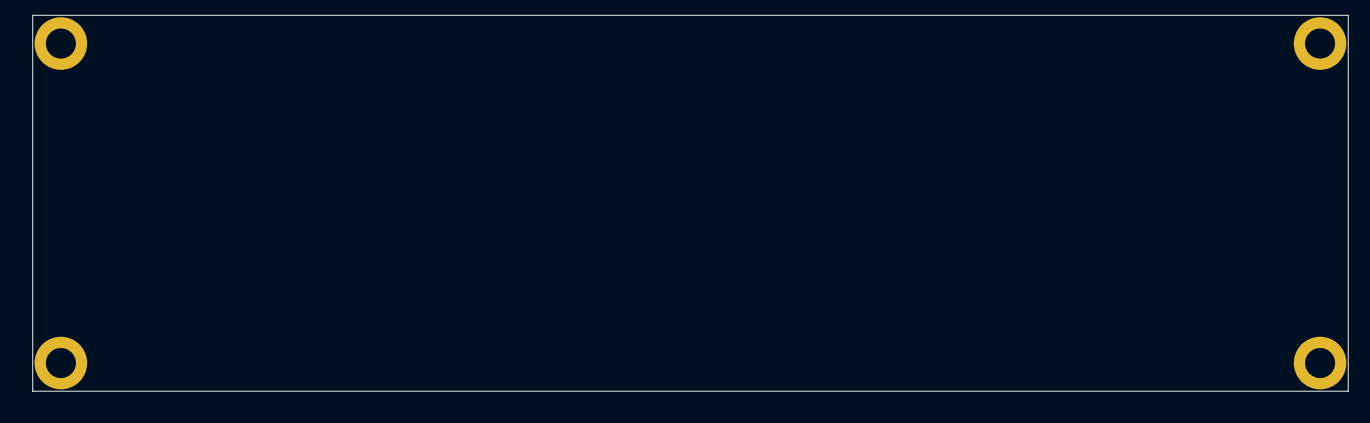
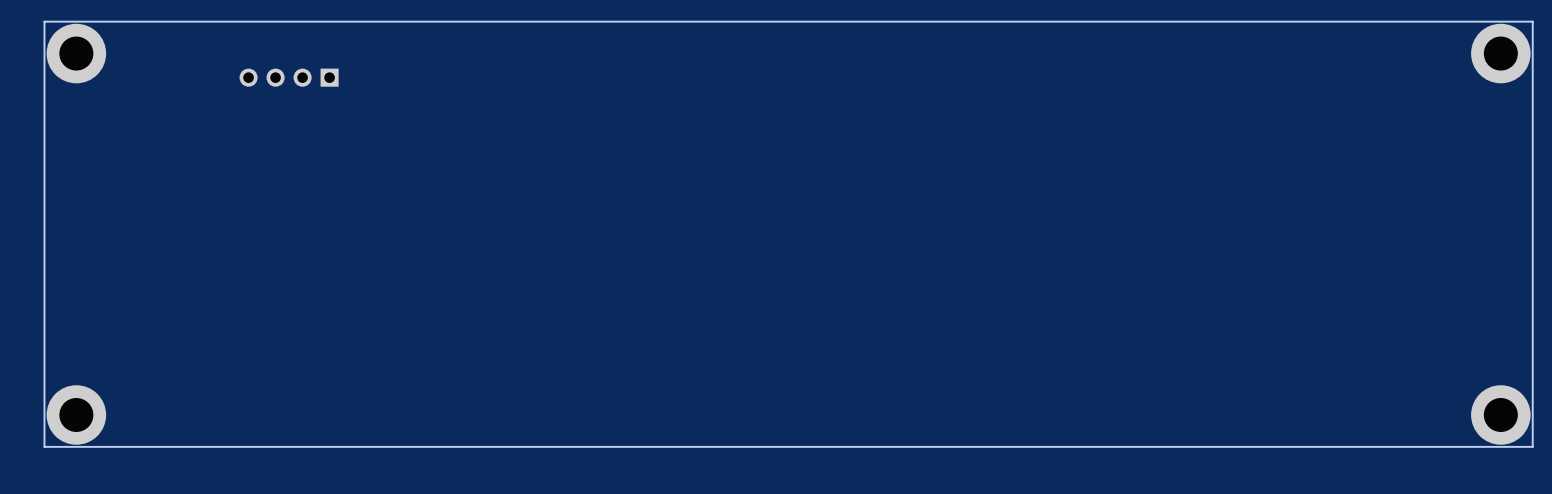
part: none -> (289, 77)

